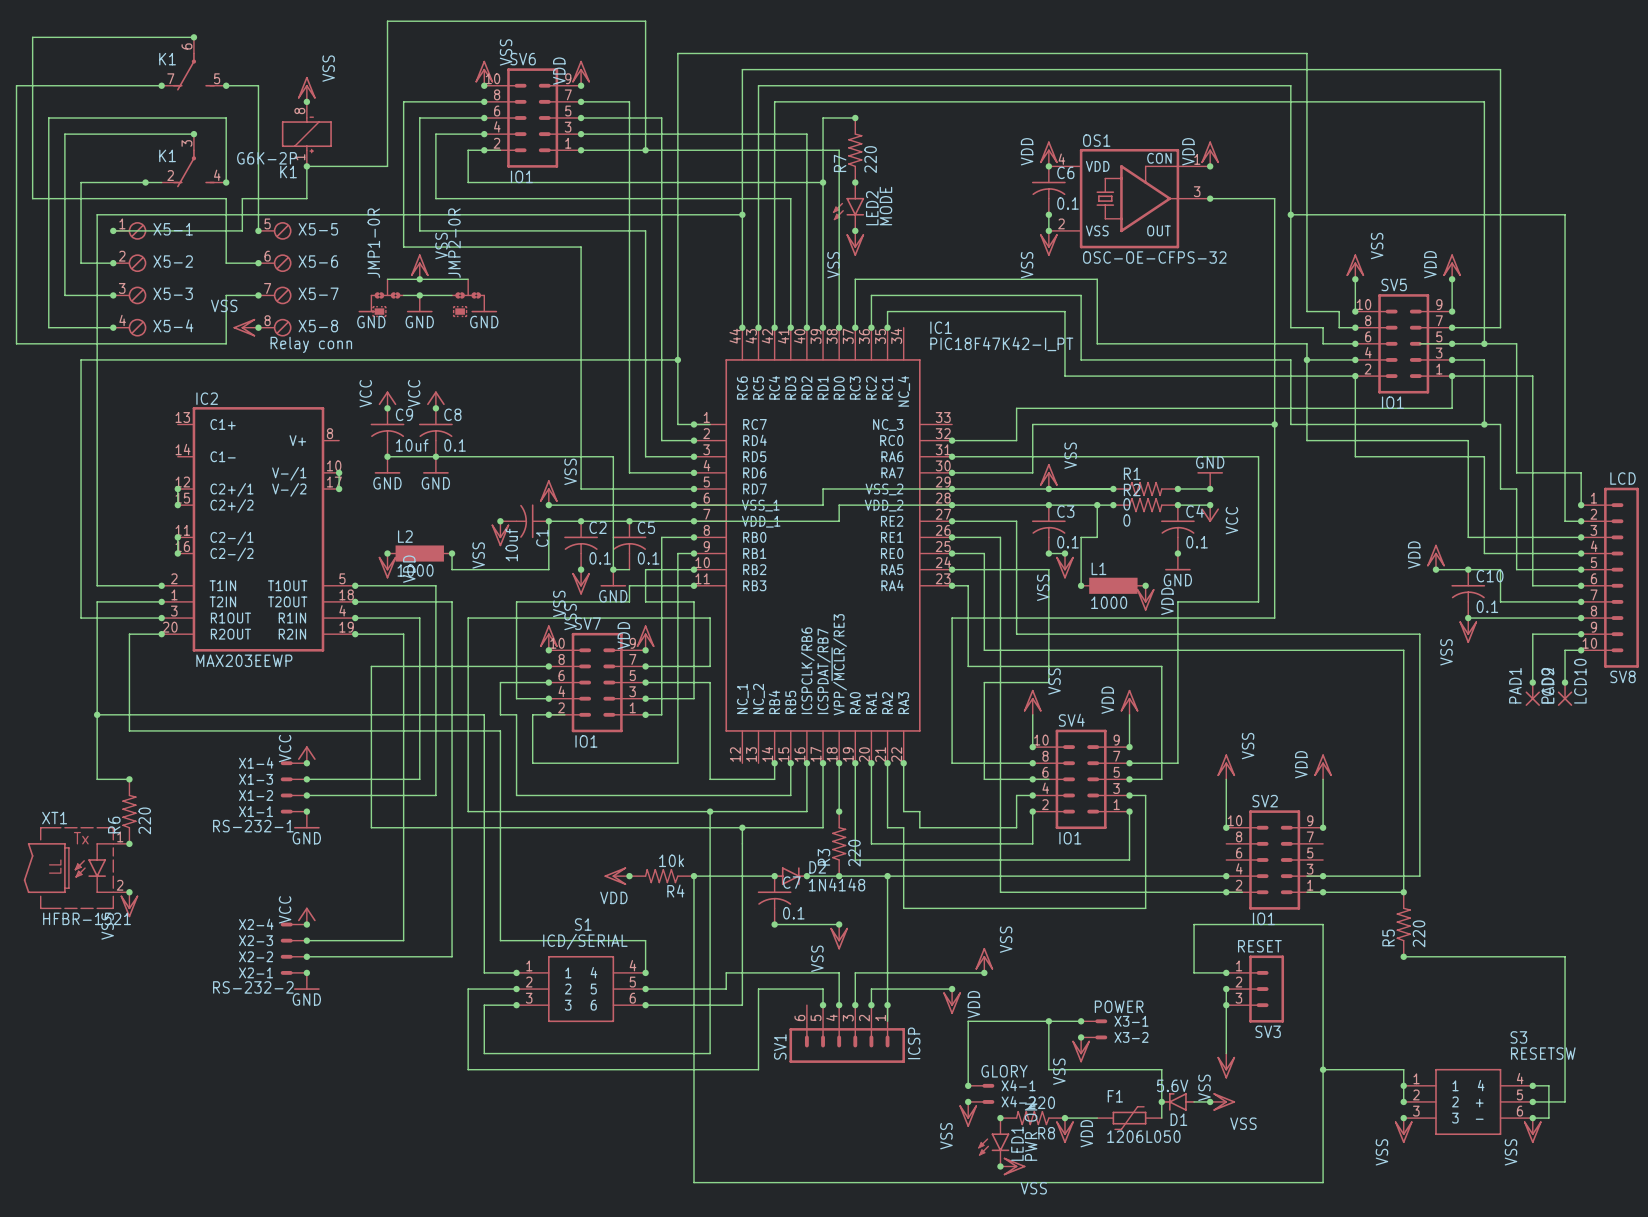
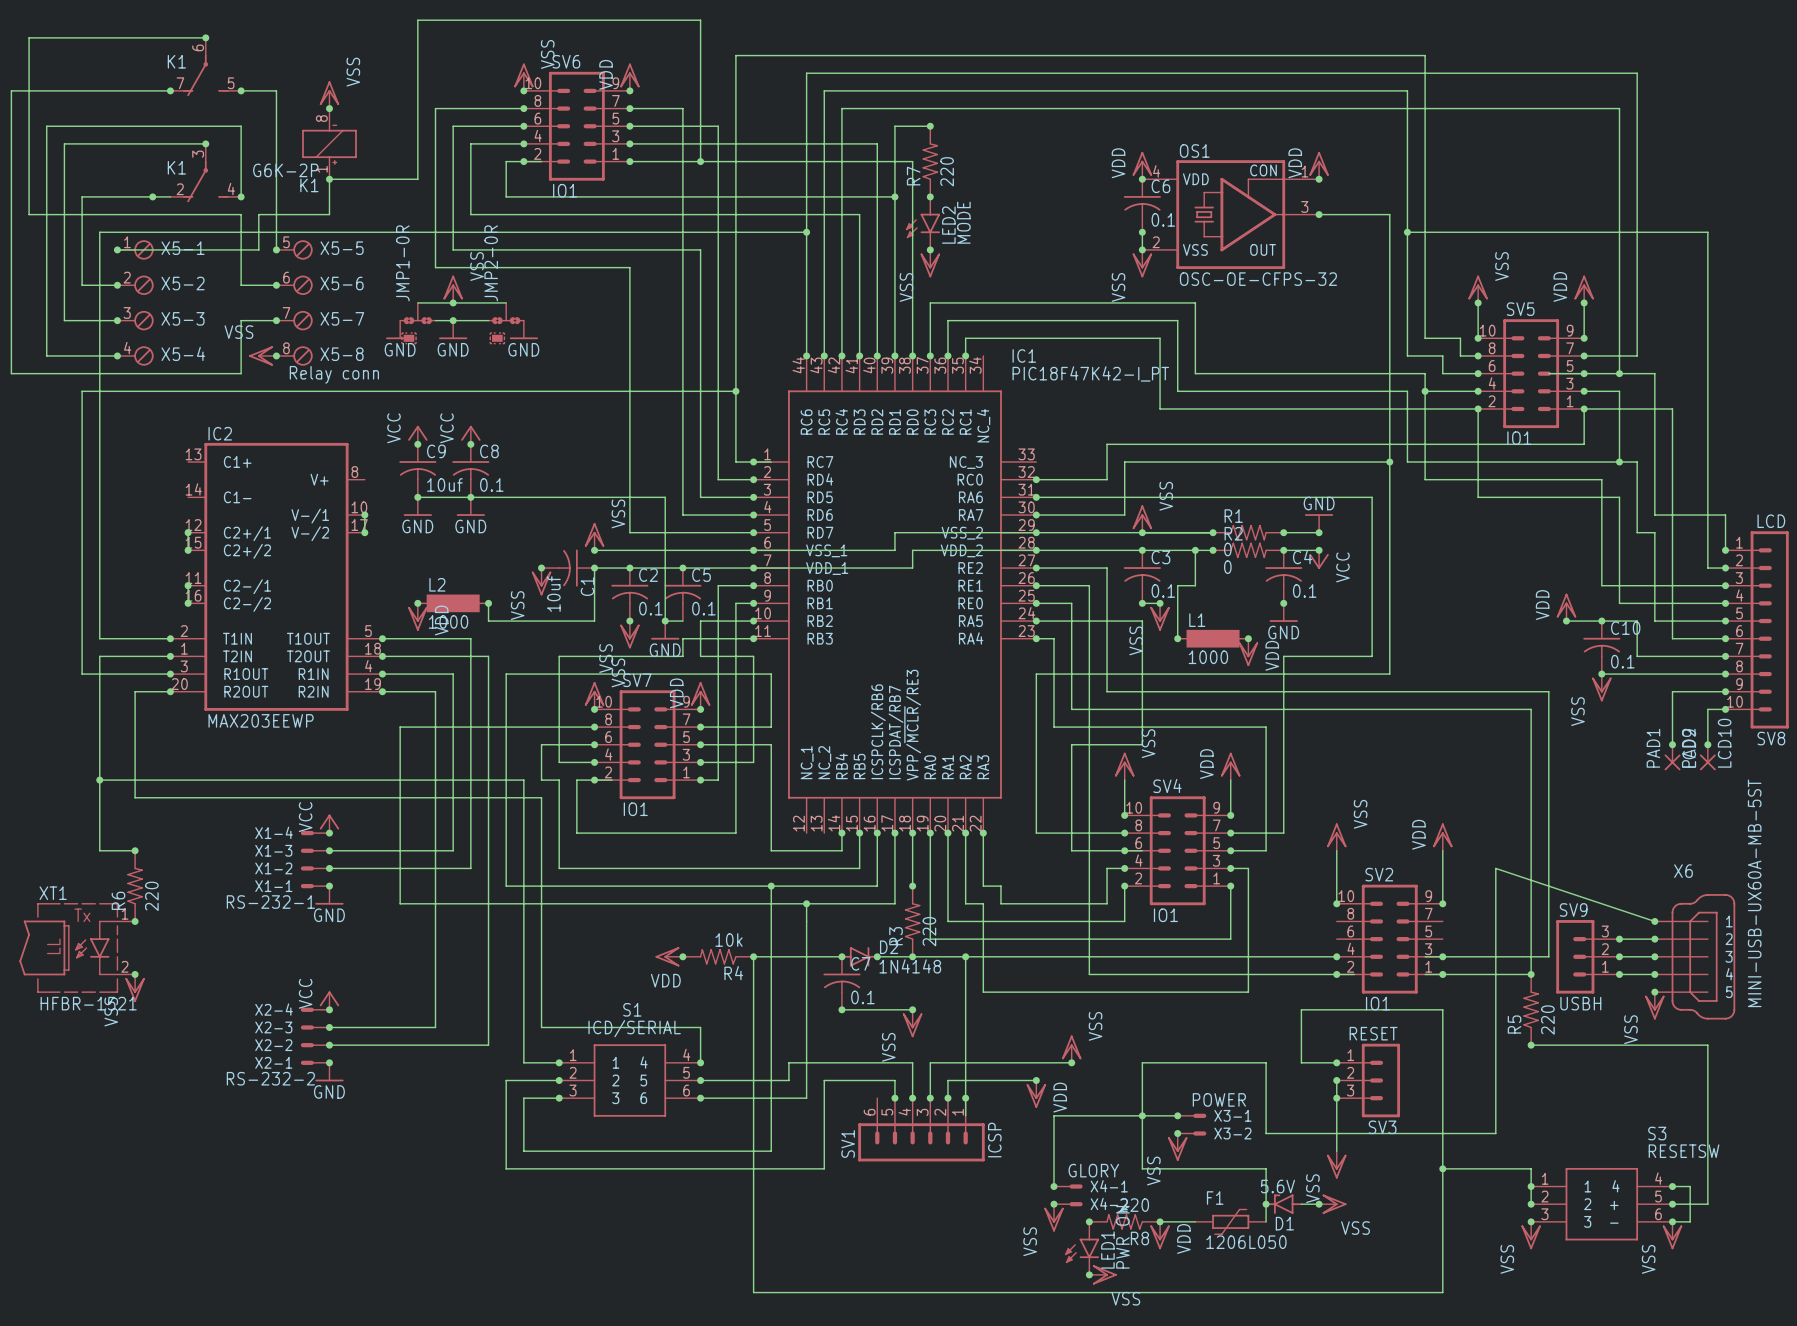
wire: none -> (1654, 921) (1495, 868) (1495, 1133) (1266, 1133) (1266, 1062) (1142, 1062) (1142, 1115)
junction: none -> (1654, 921)
wire: none -> (1619, 939) (1654, 939)
junction: none -> (1619, 939)
junction: none -> (1654, 939)
SV9: none -> USBH (1587, 956)
wire: none -> (1619, 956) (1654, 956)
junction: none -> (1619, 956)
junction: none -> (1654, 956)
X6: none -> MINI-USB-UX60A-MB-5ST (1695, 956)
wire: none -> (1619, 974) (1654, 974)
junction: none -> (1619, 974)
junction: none -> (1654, 974)
junction: none -> (1654, 992)
power symbol: none -> VSS (1654, 1005)

